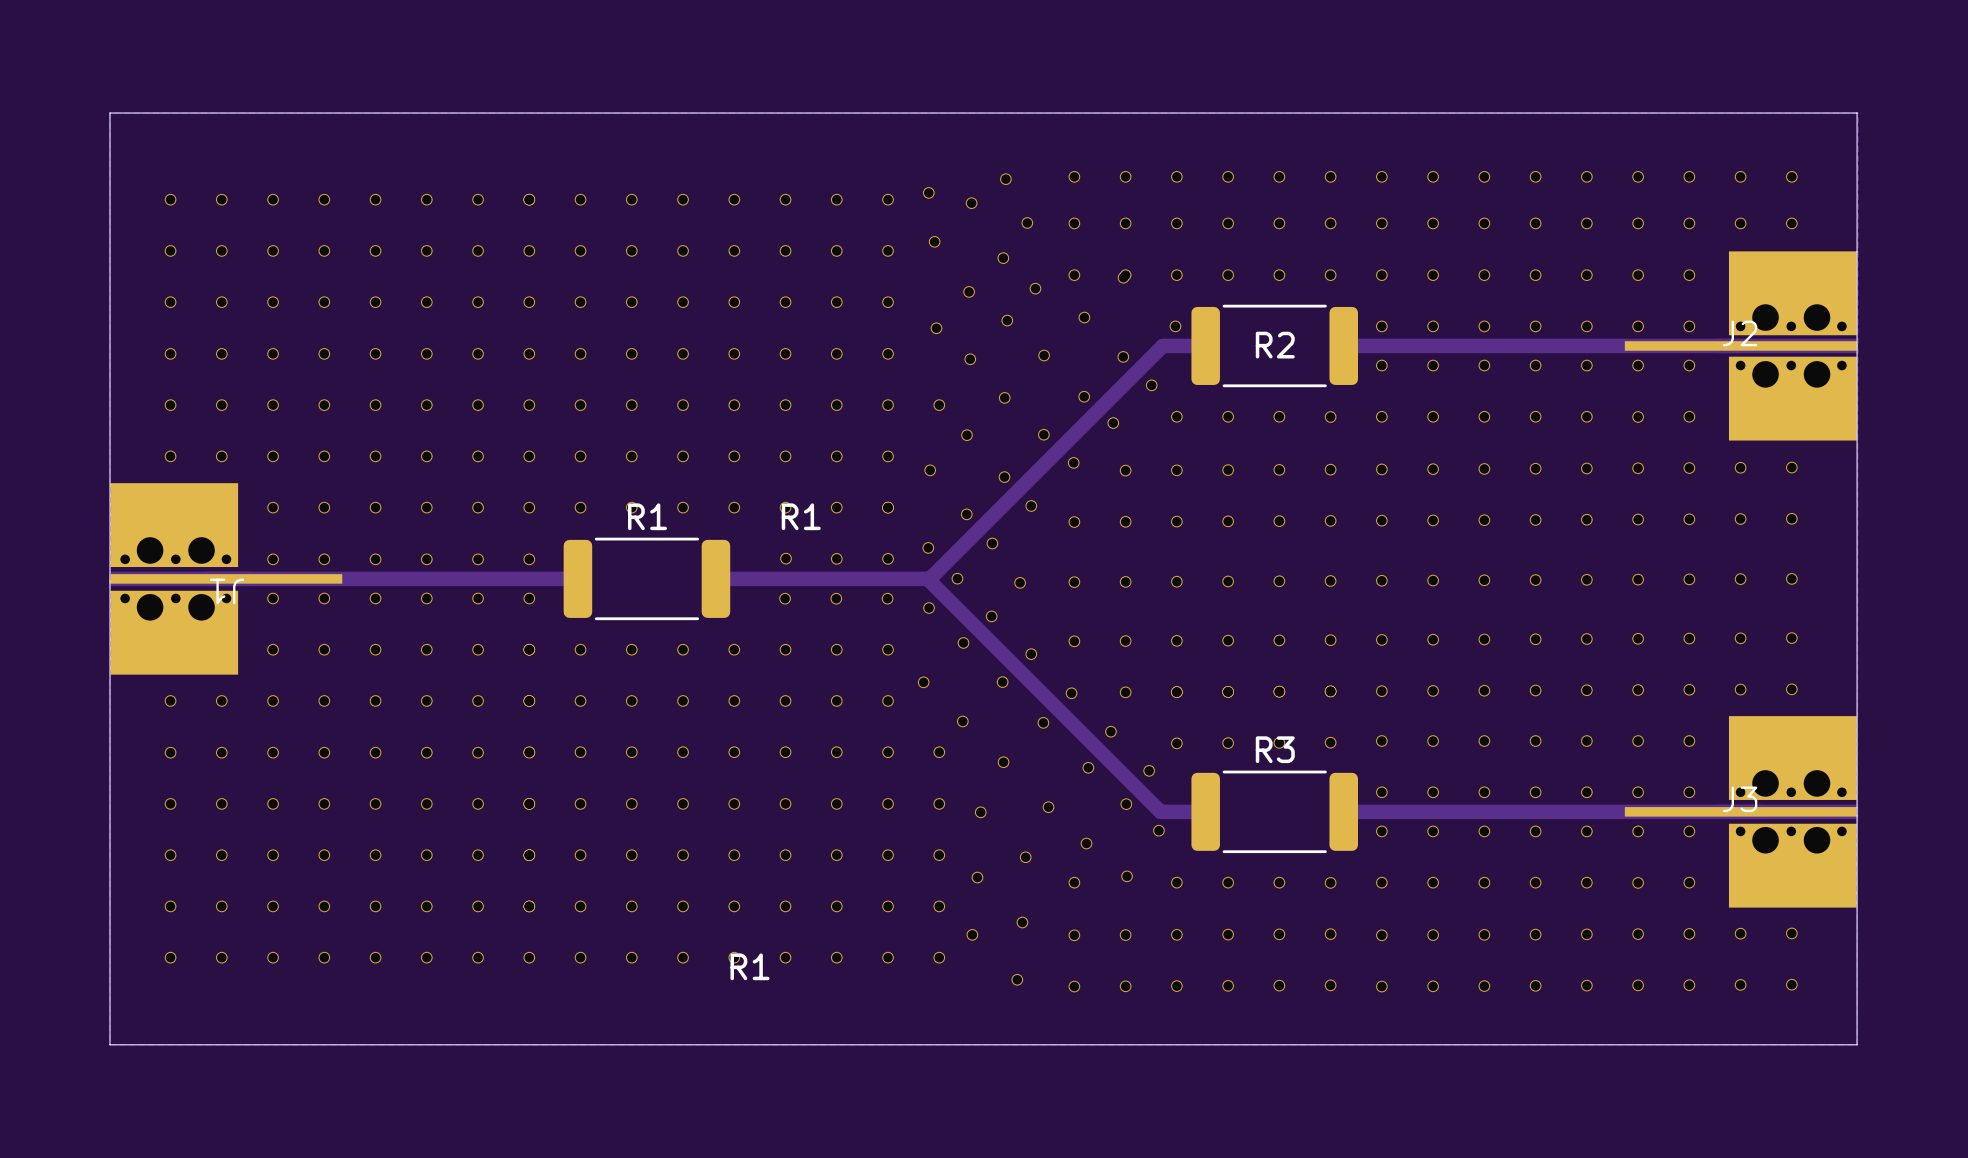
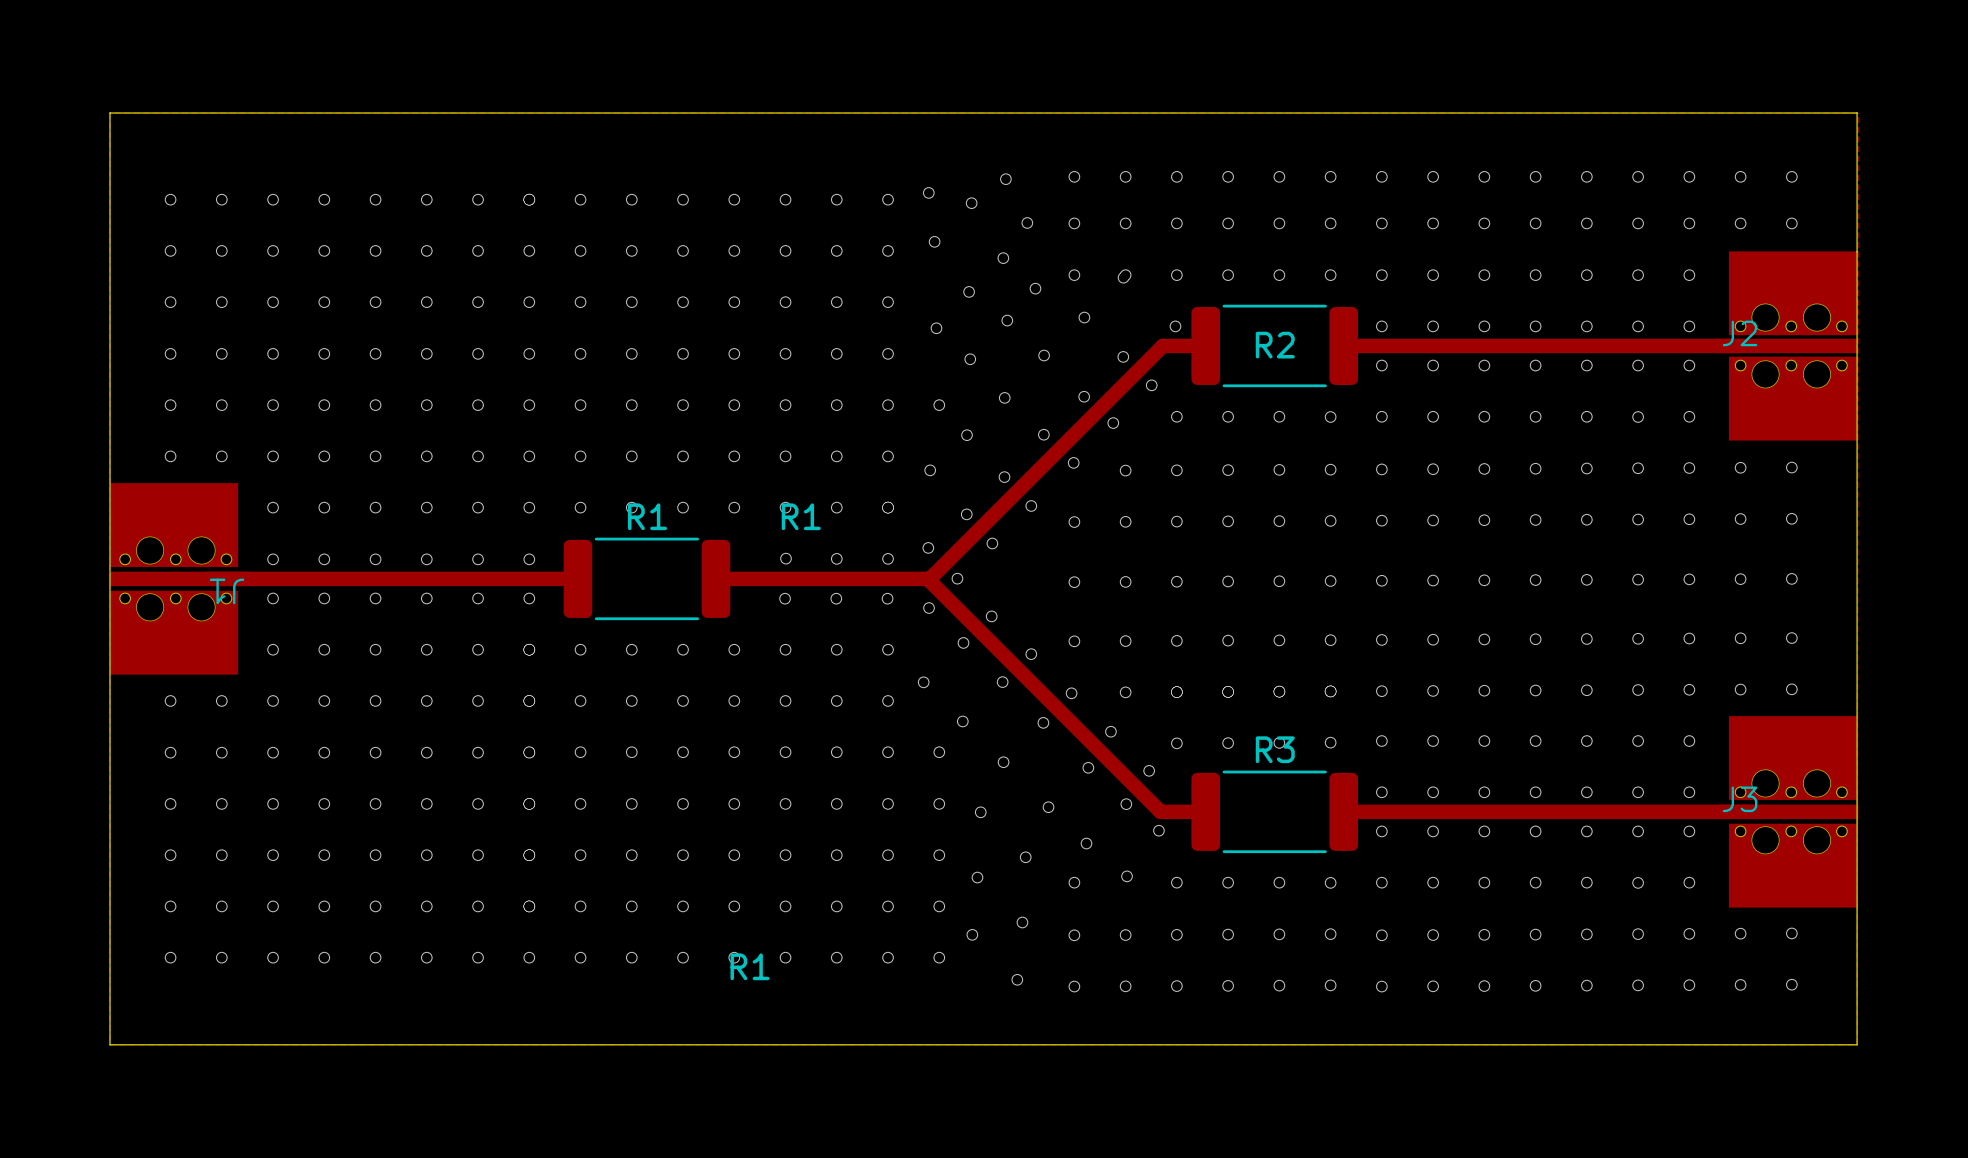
via: (1020, 582) -> none

